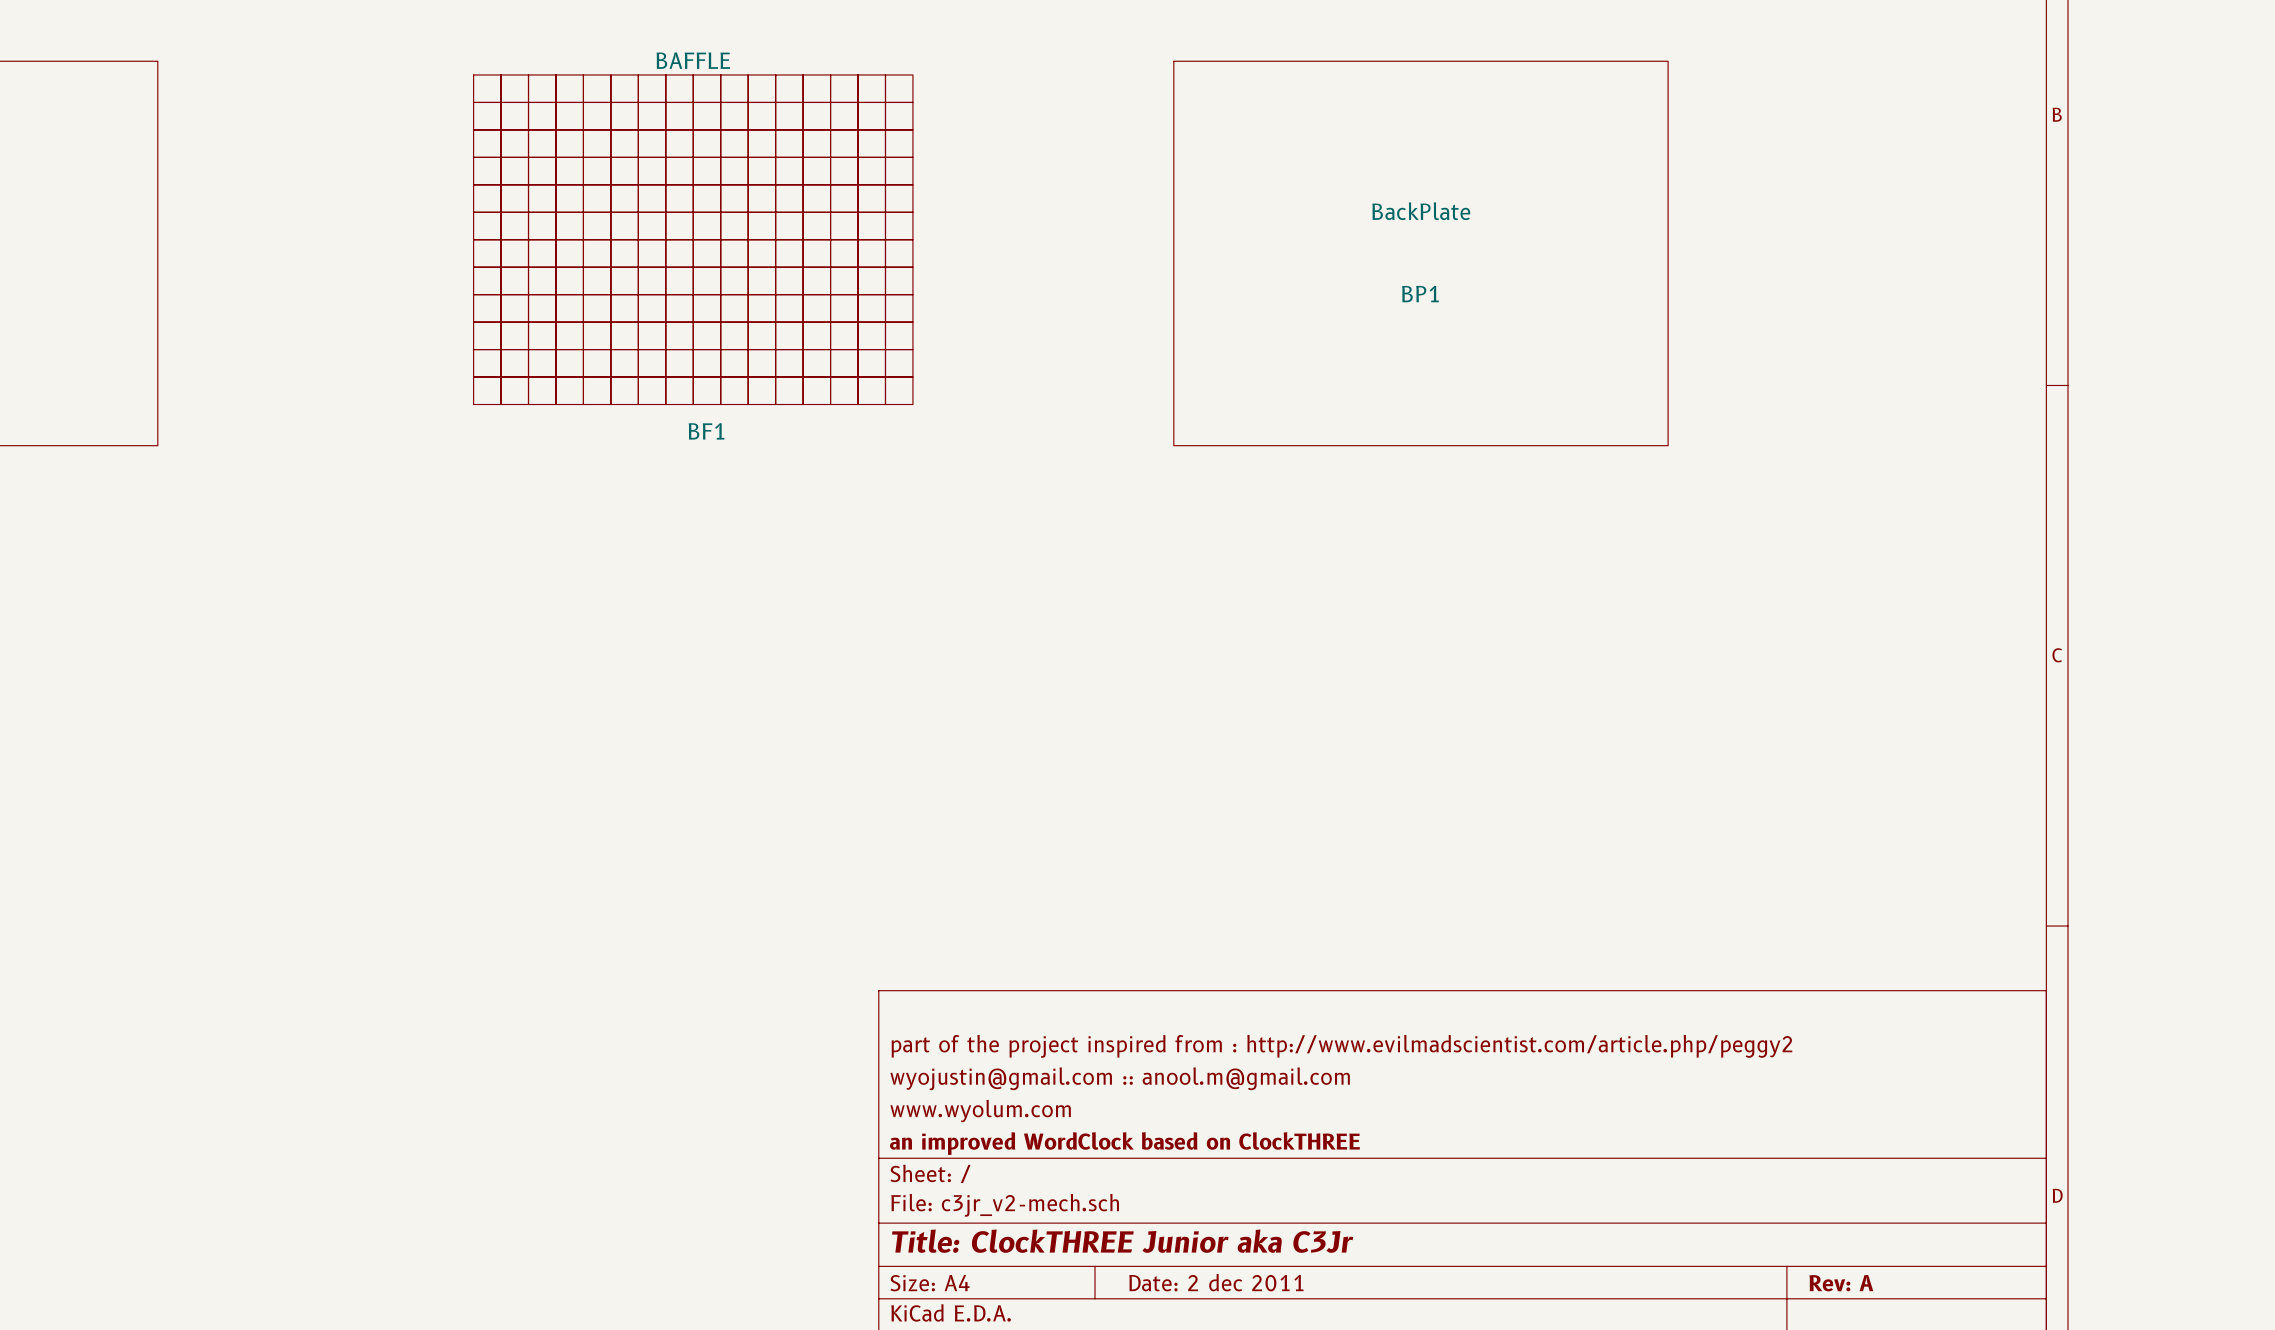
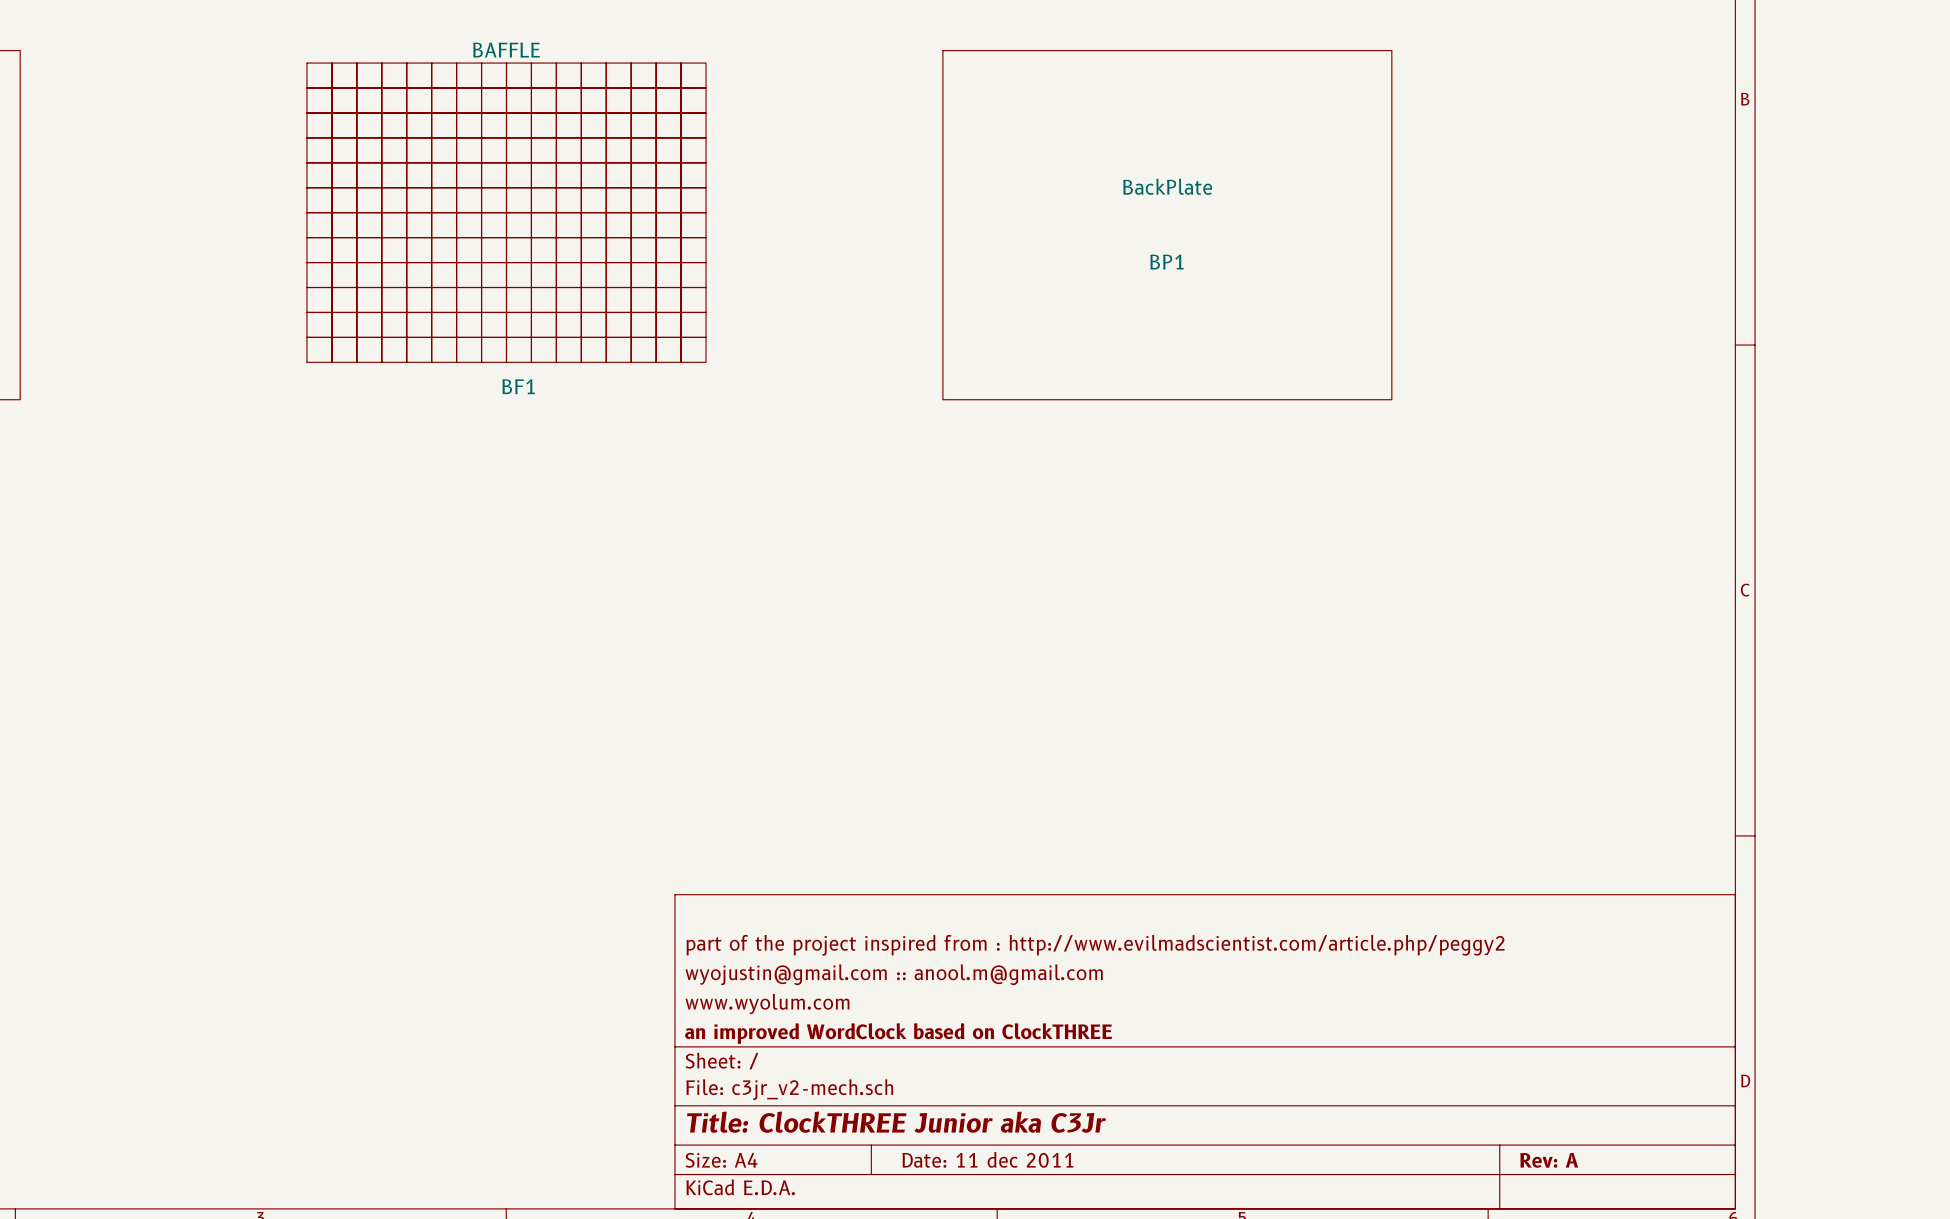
title block: Date: 2 dec 2011 (1216, 1282) -> Date: 11 dec 2011 (987, 1159)

